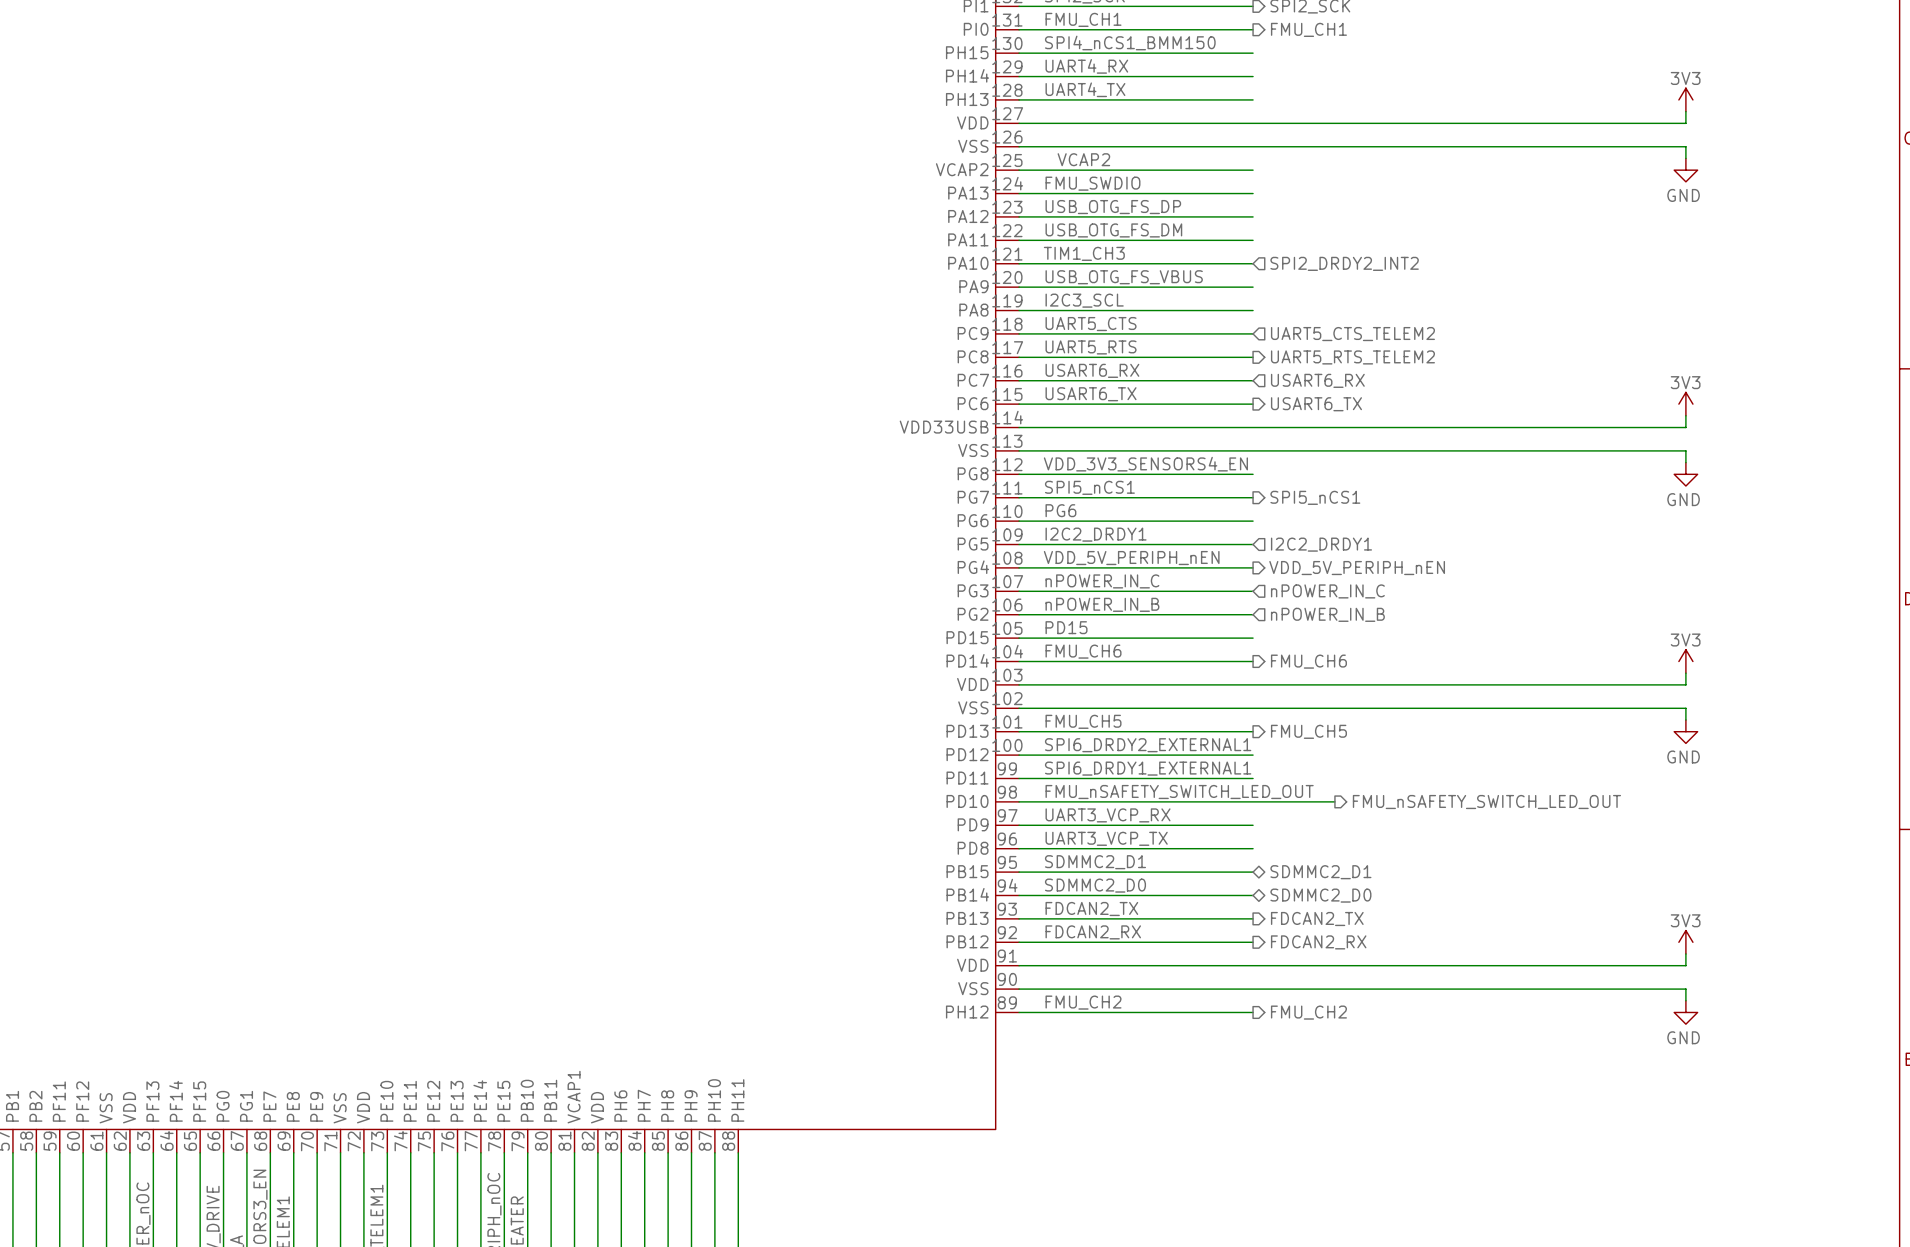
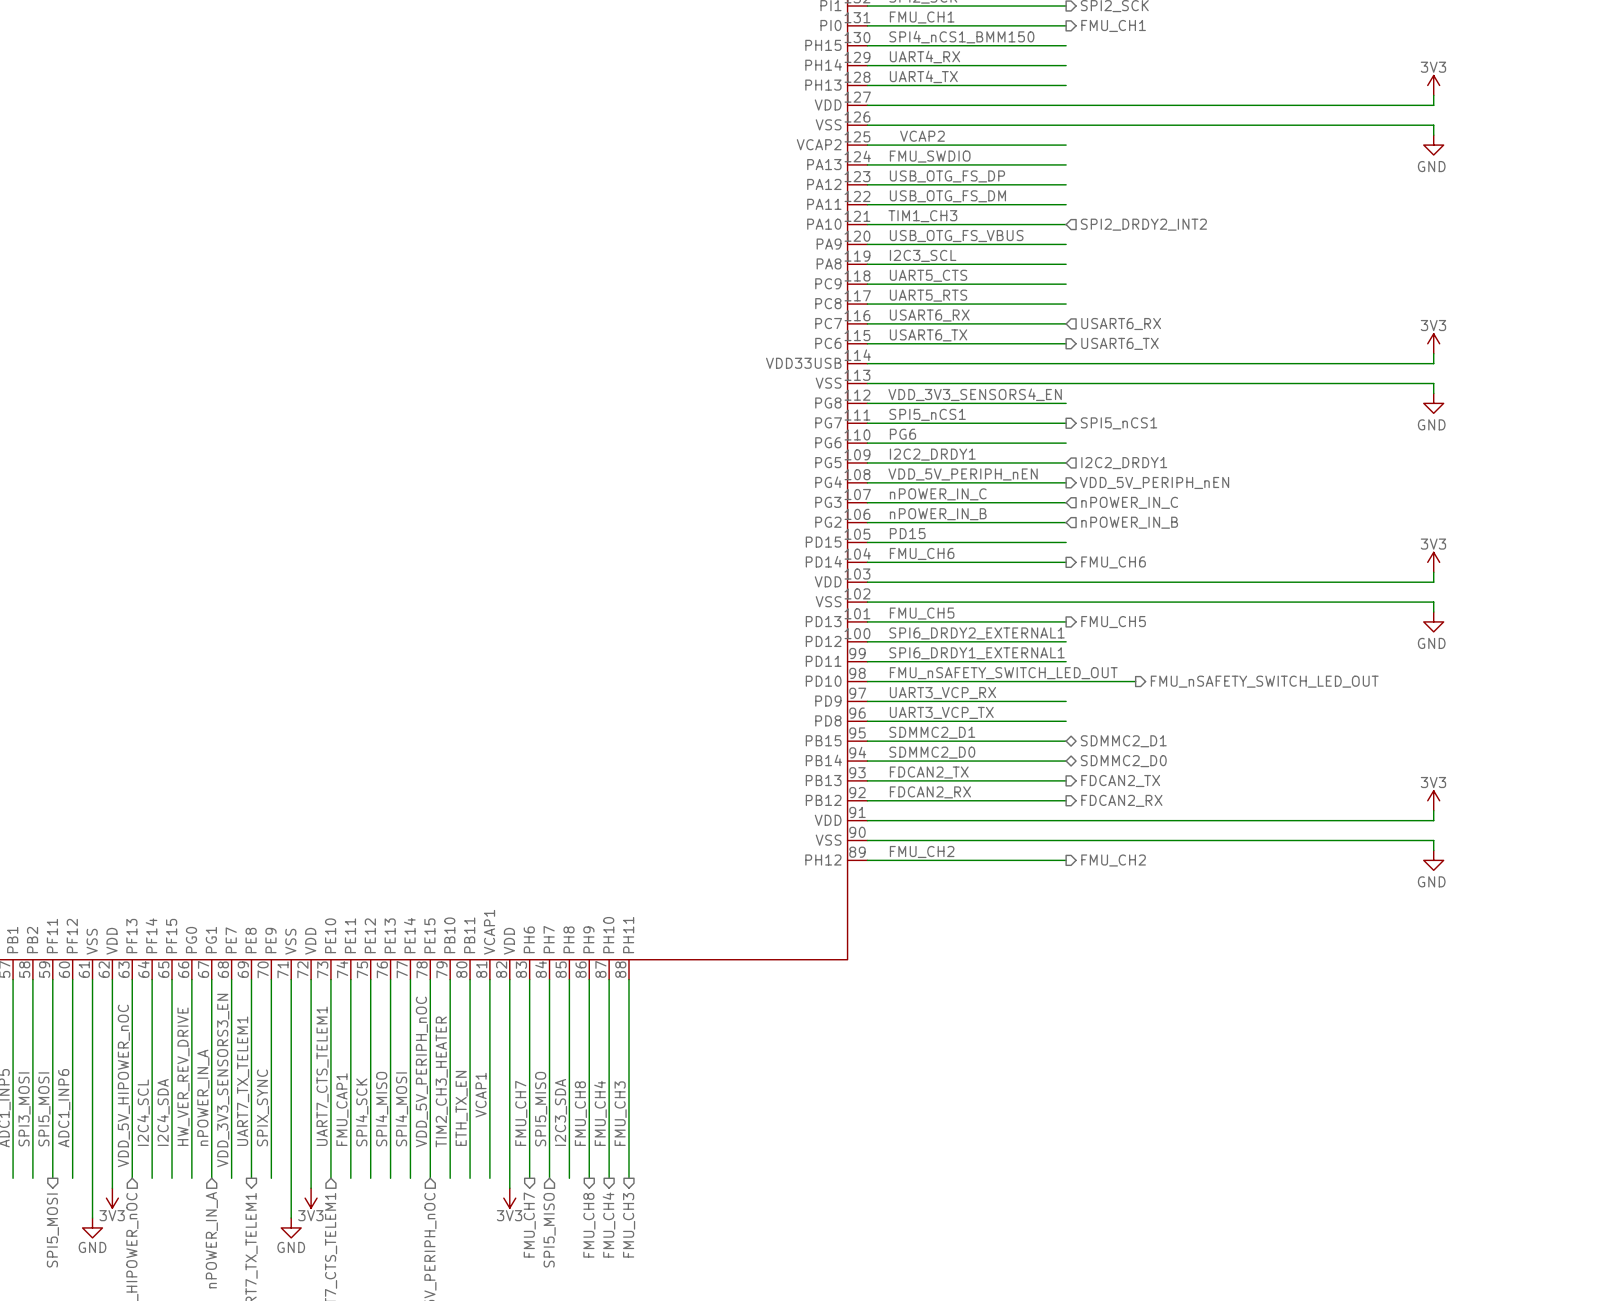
hierarchical label: UART5_CTS_TELEM2 (1352, 334) -> none
hierarchical label: UART5_RTS_TELEM2 (1352, 357) -> none

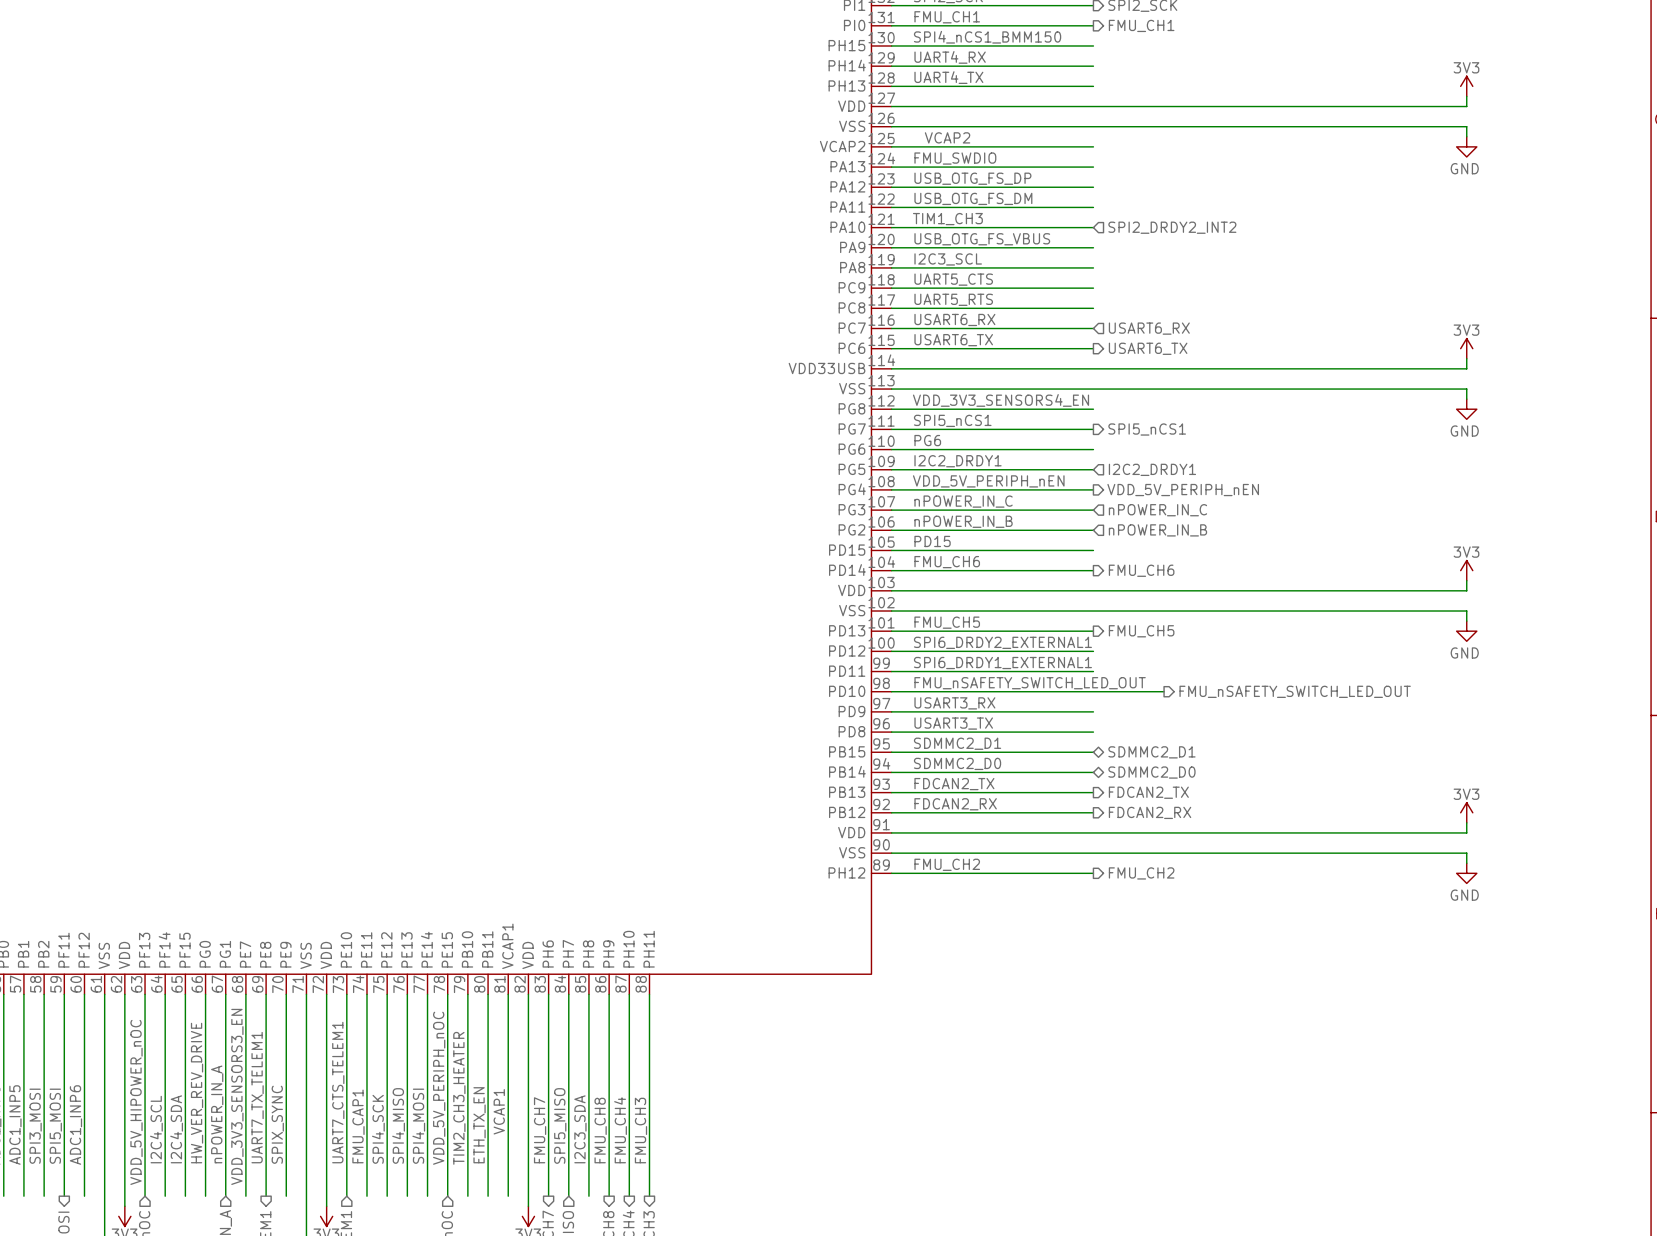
label: UART3_VCP_RX (942, 693) -> USART3_RX (954, 703)
label: UART3_VCP_TX (941, 712) -> USART3_TX (953, 723)

